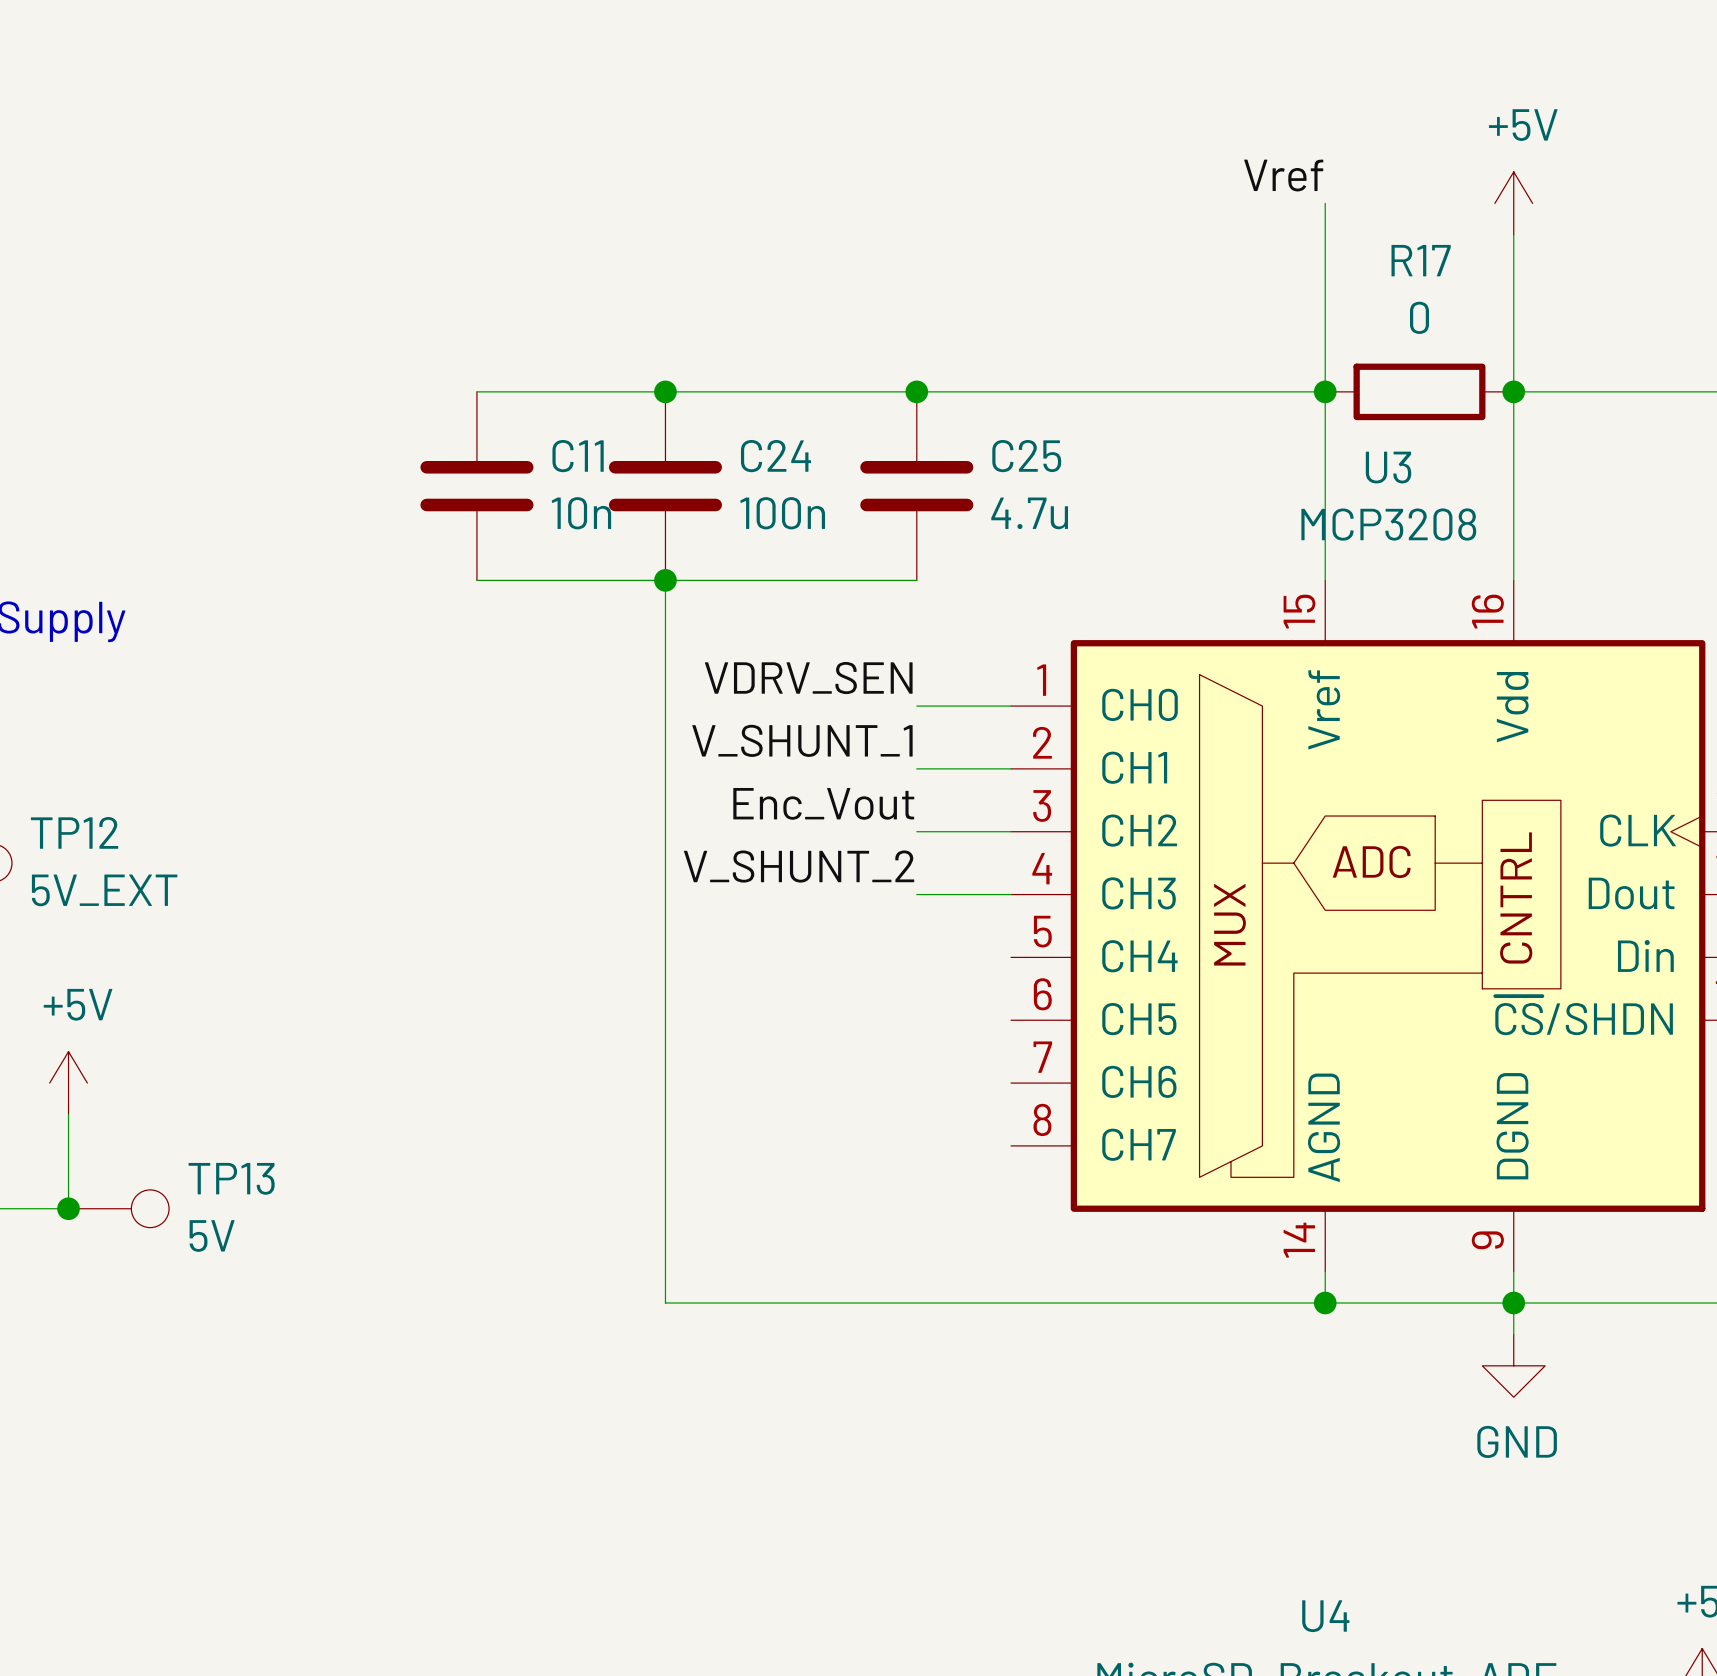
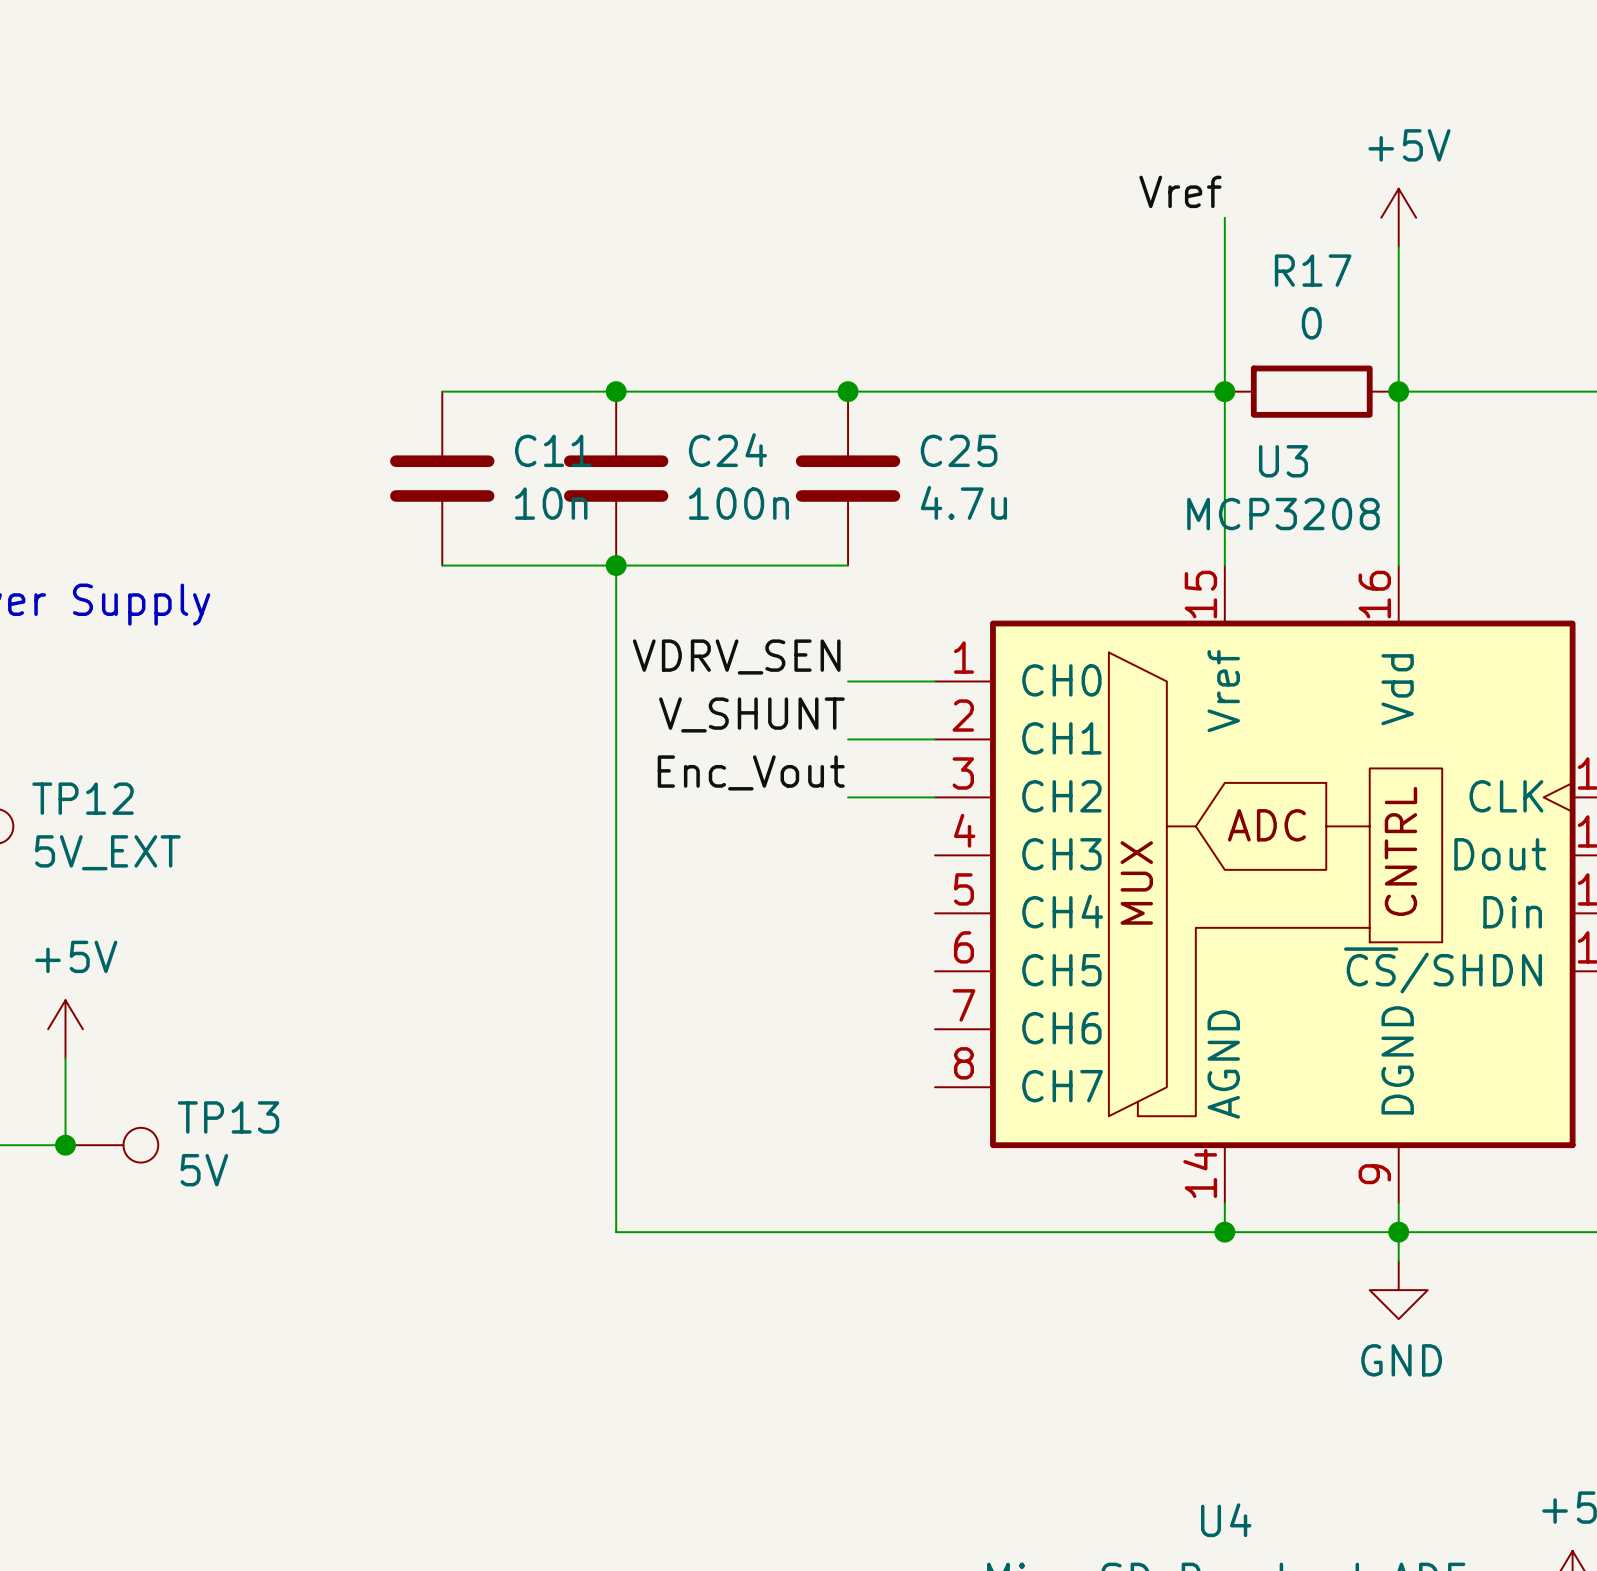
label: V_SHUNT_1 (802, 740) -> V_SHUNT (751, 714)
label: V_SHUNT_2 (799, 866) -> none
wire: (916, 894) (1011, 894) -> none

